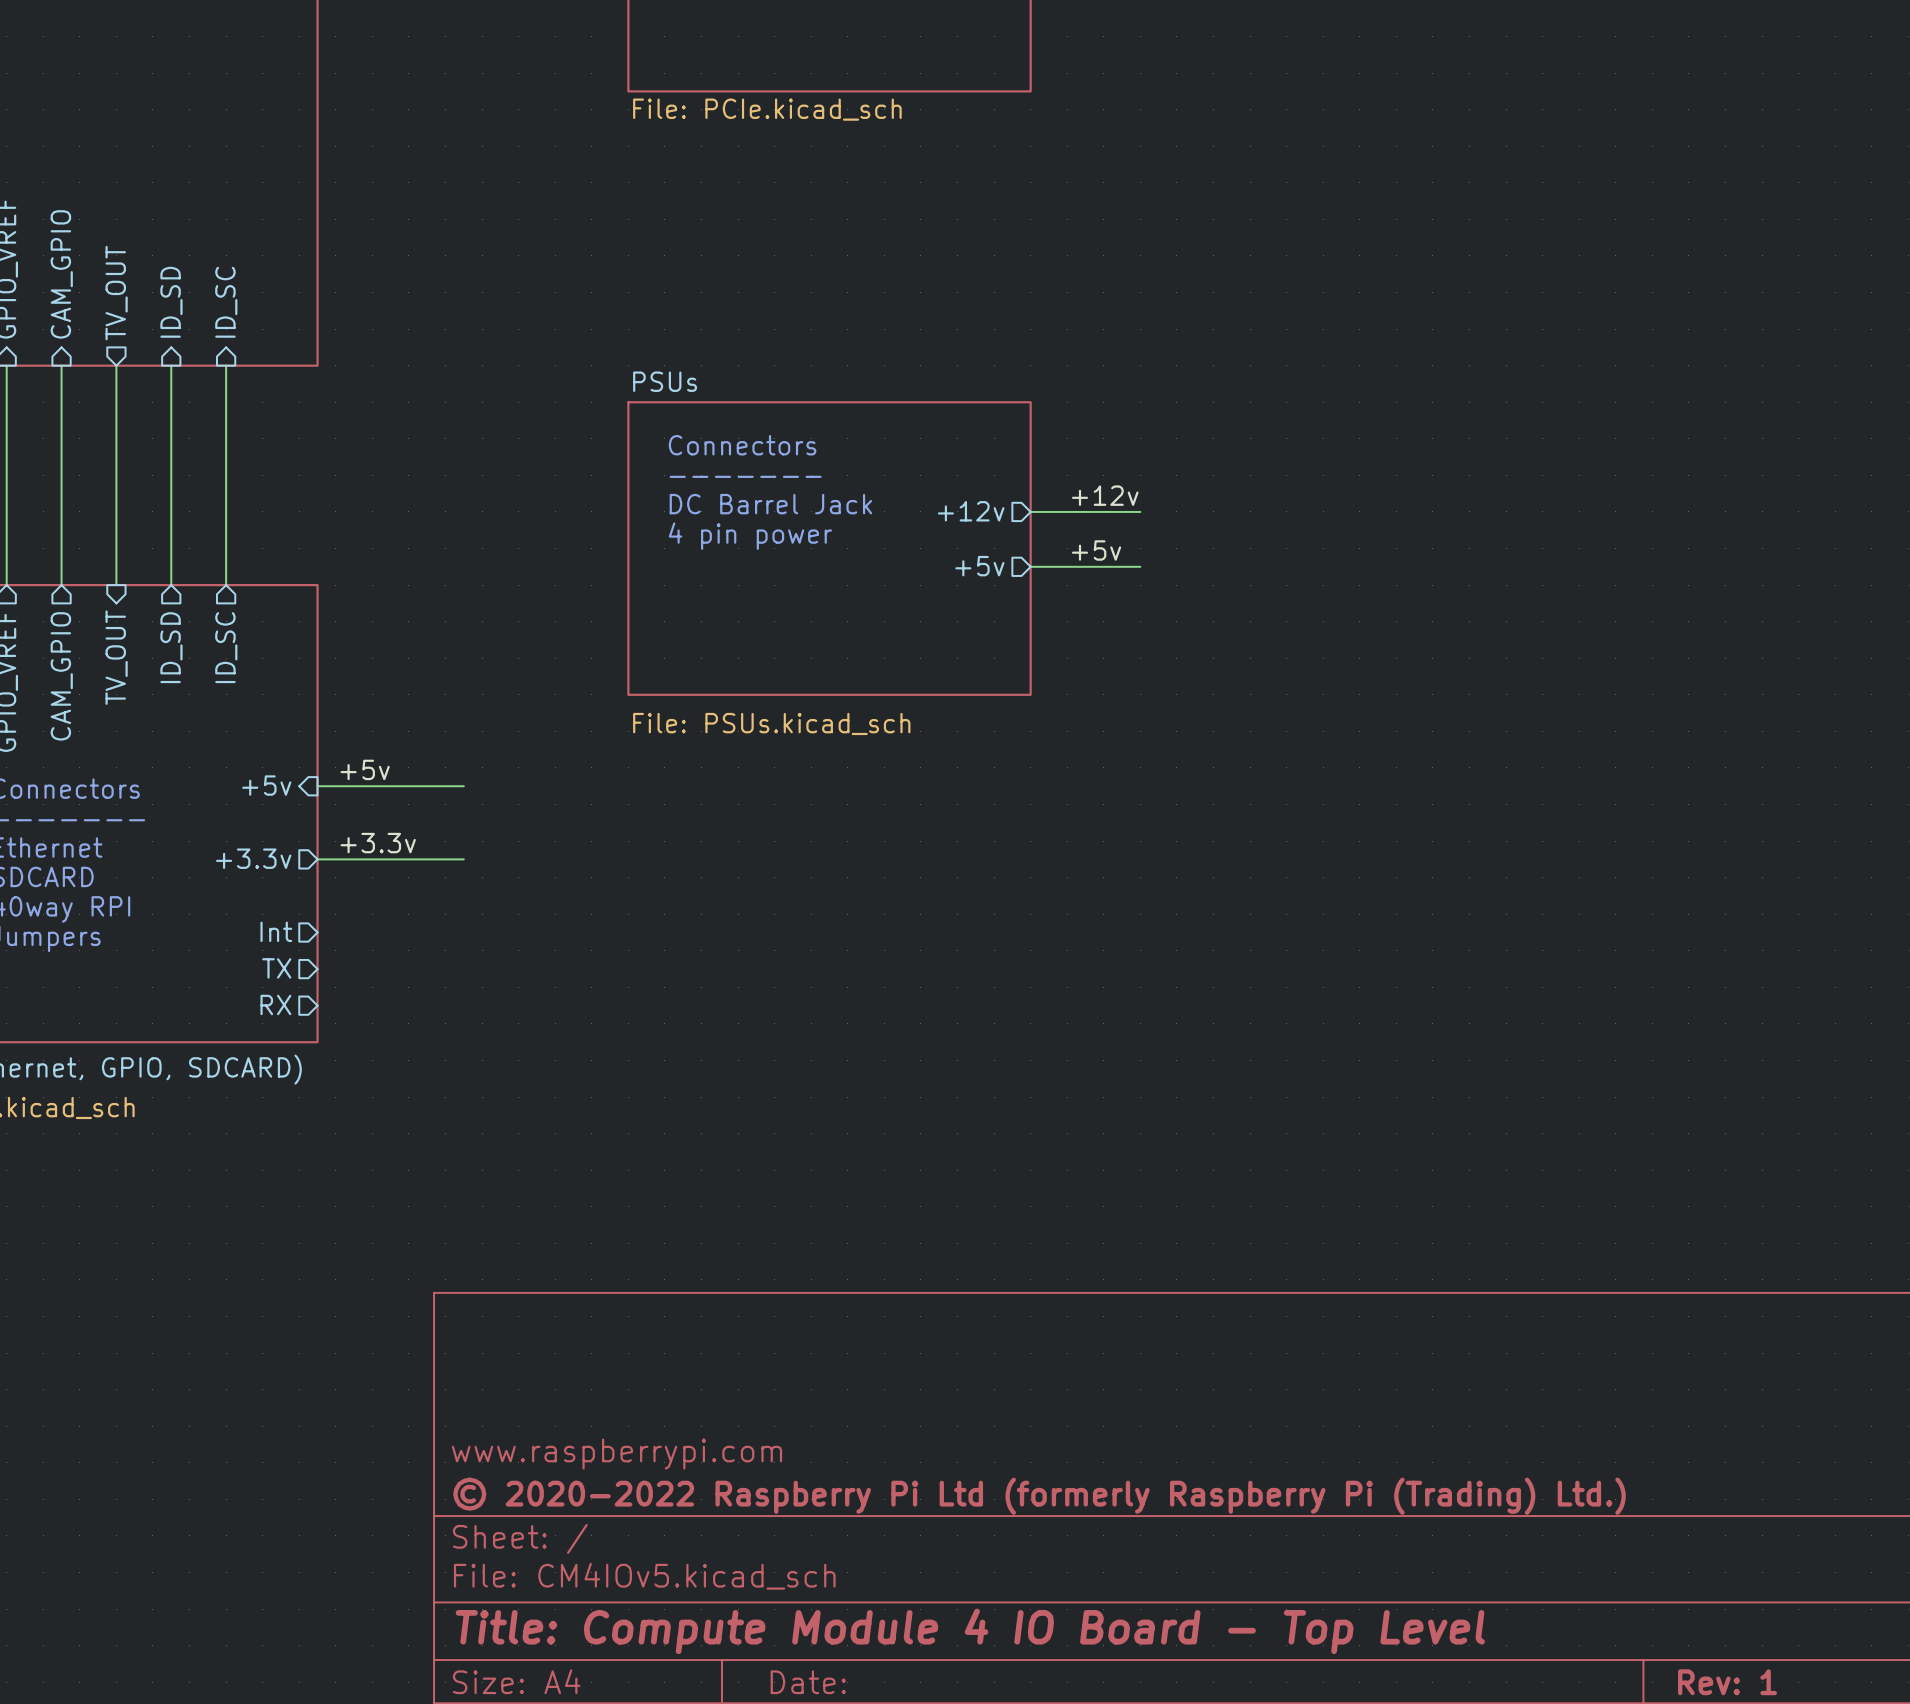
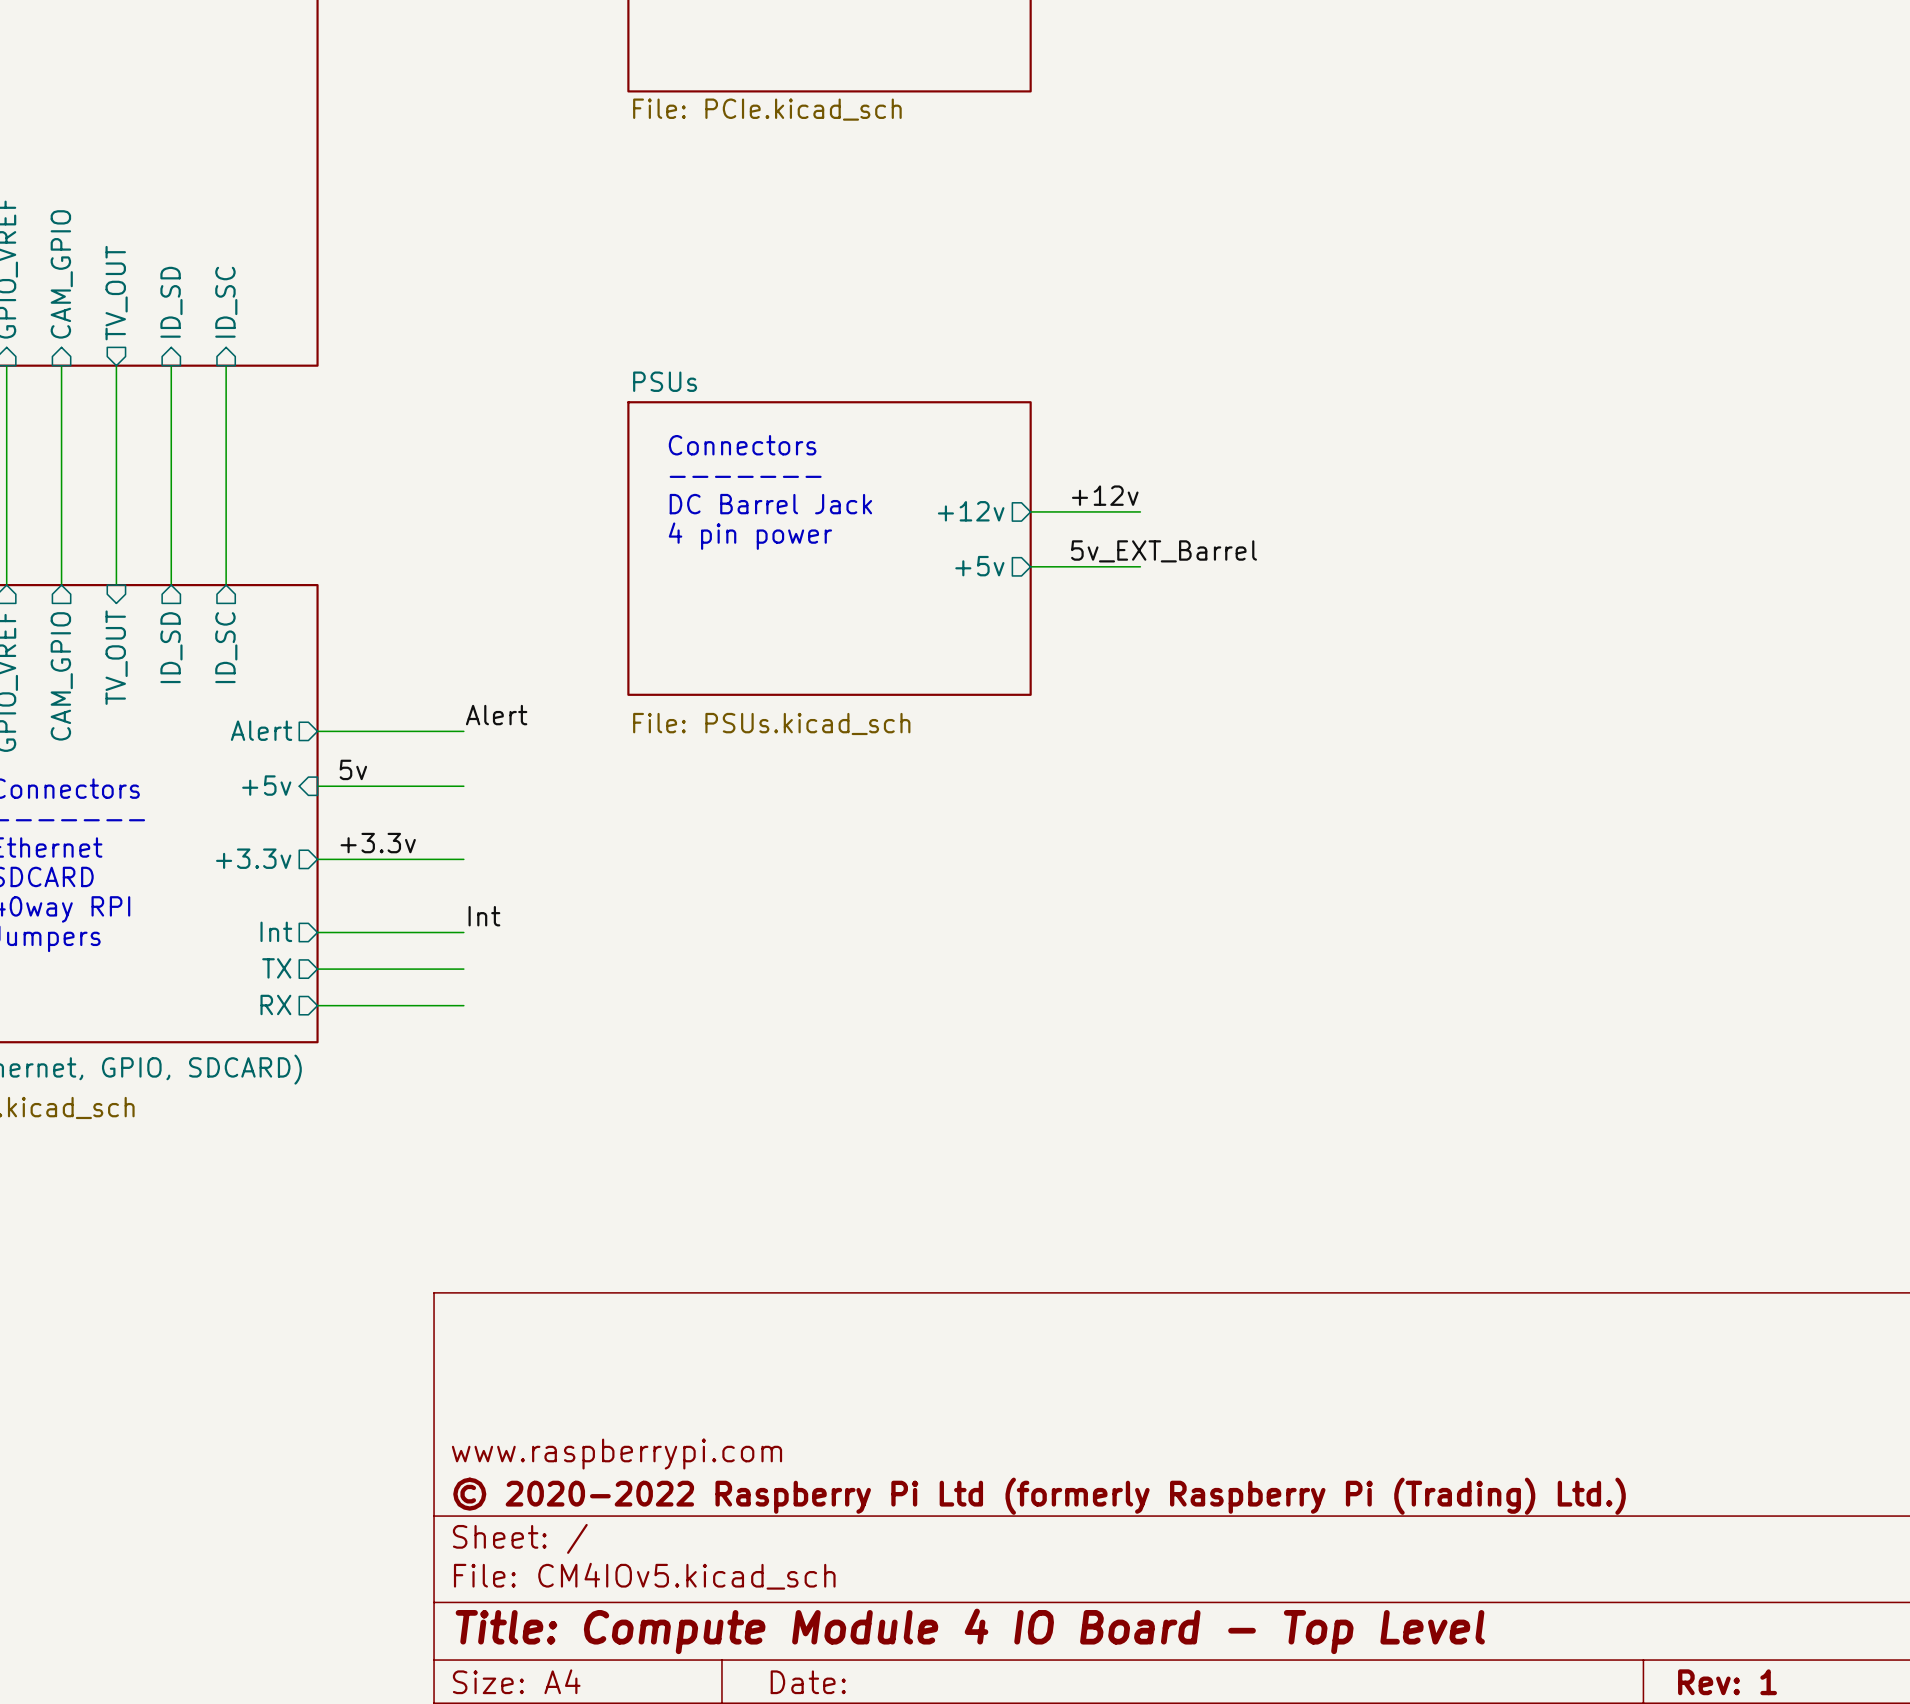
label: +5v (1096, 550) -> 5v_EXT_Barrel (1164, 551)
label: none -> Alert (496, 715)
sheet pin: none -> Alert (261, 730)
wire: none -> (317, 731) (463, 731)
label: +5v (365, 769) -> 5v (353, 769)
label: none -> Int (484, 916)
wire: none -> (317, 932) (463, 932)
wire: none -> (317, 969) (463, 969)
wire: none -> (317, 1005) (463, 1005)

